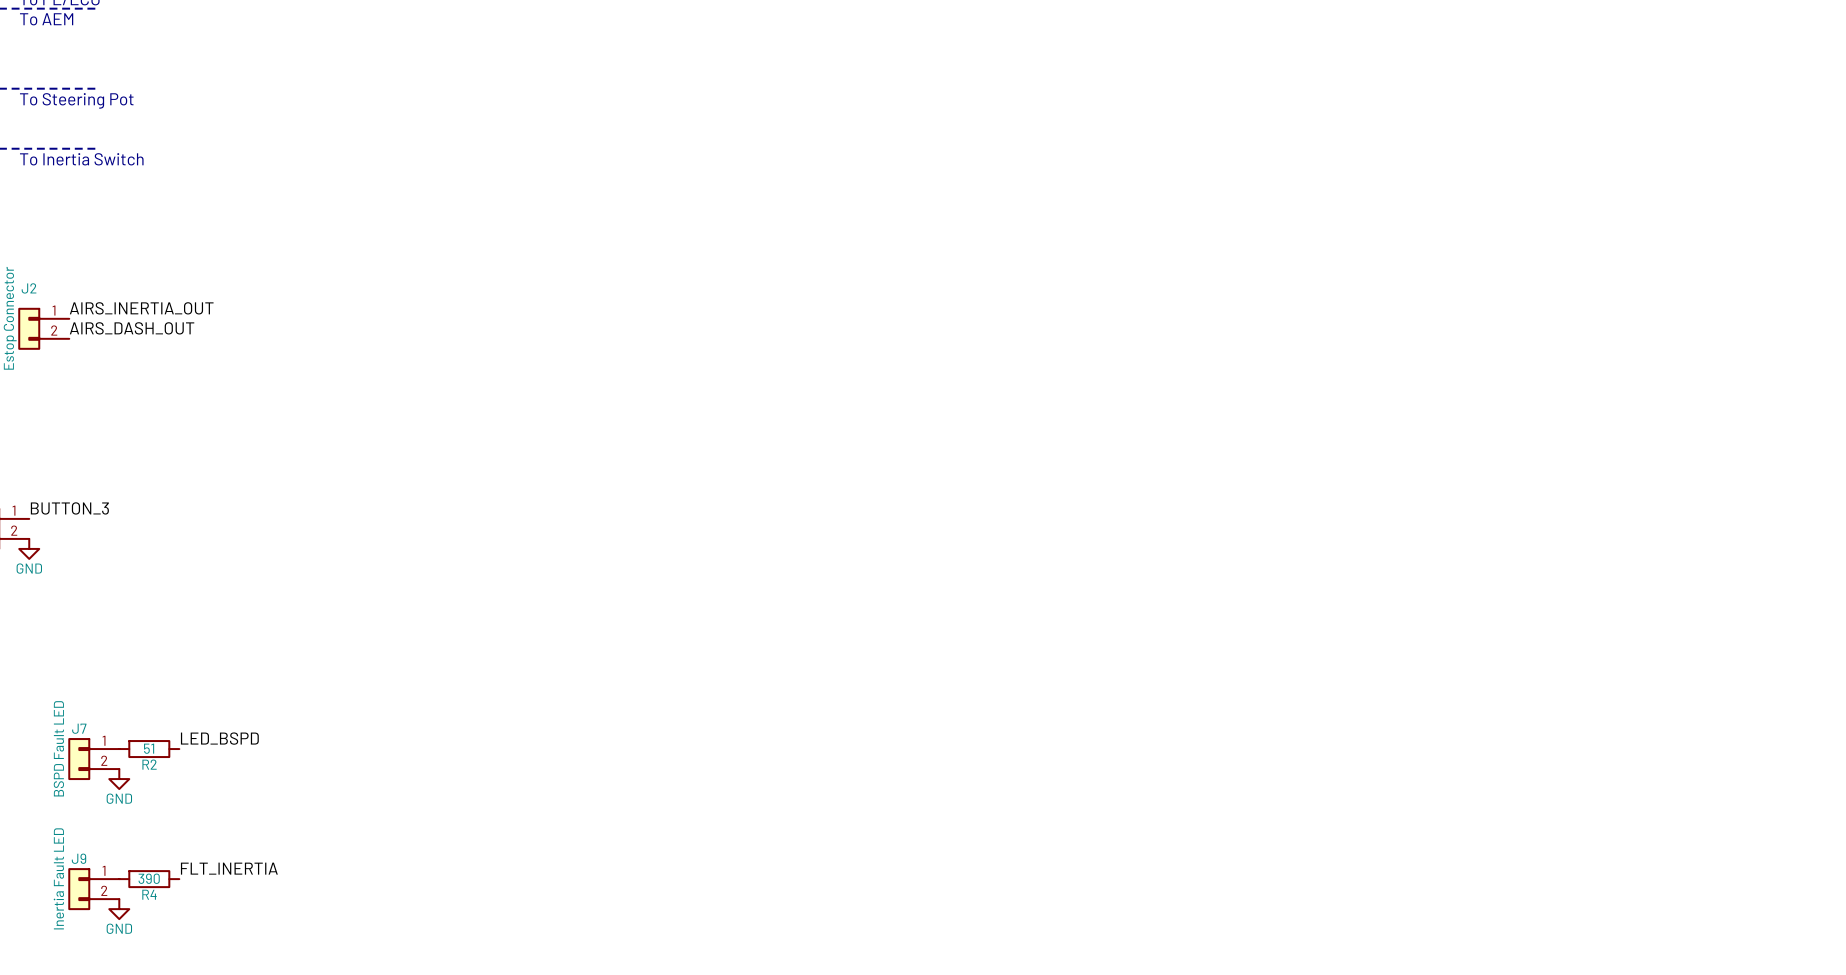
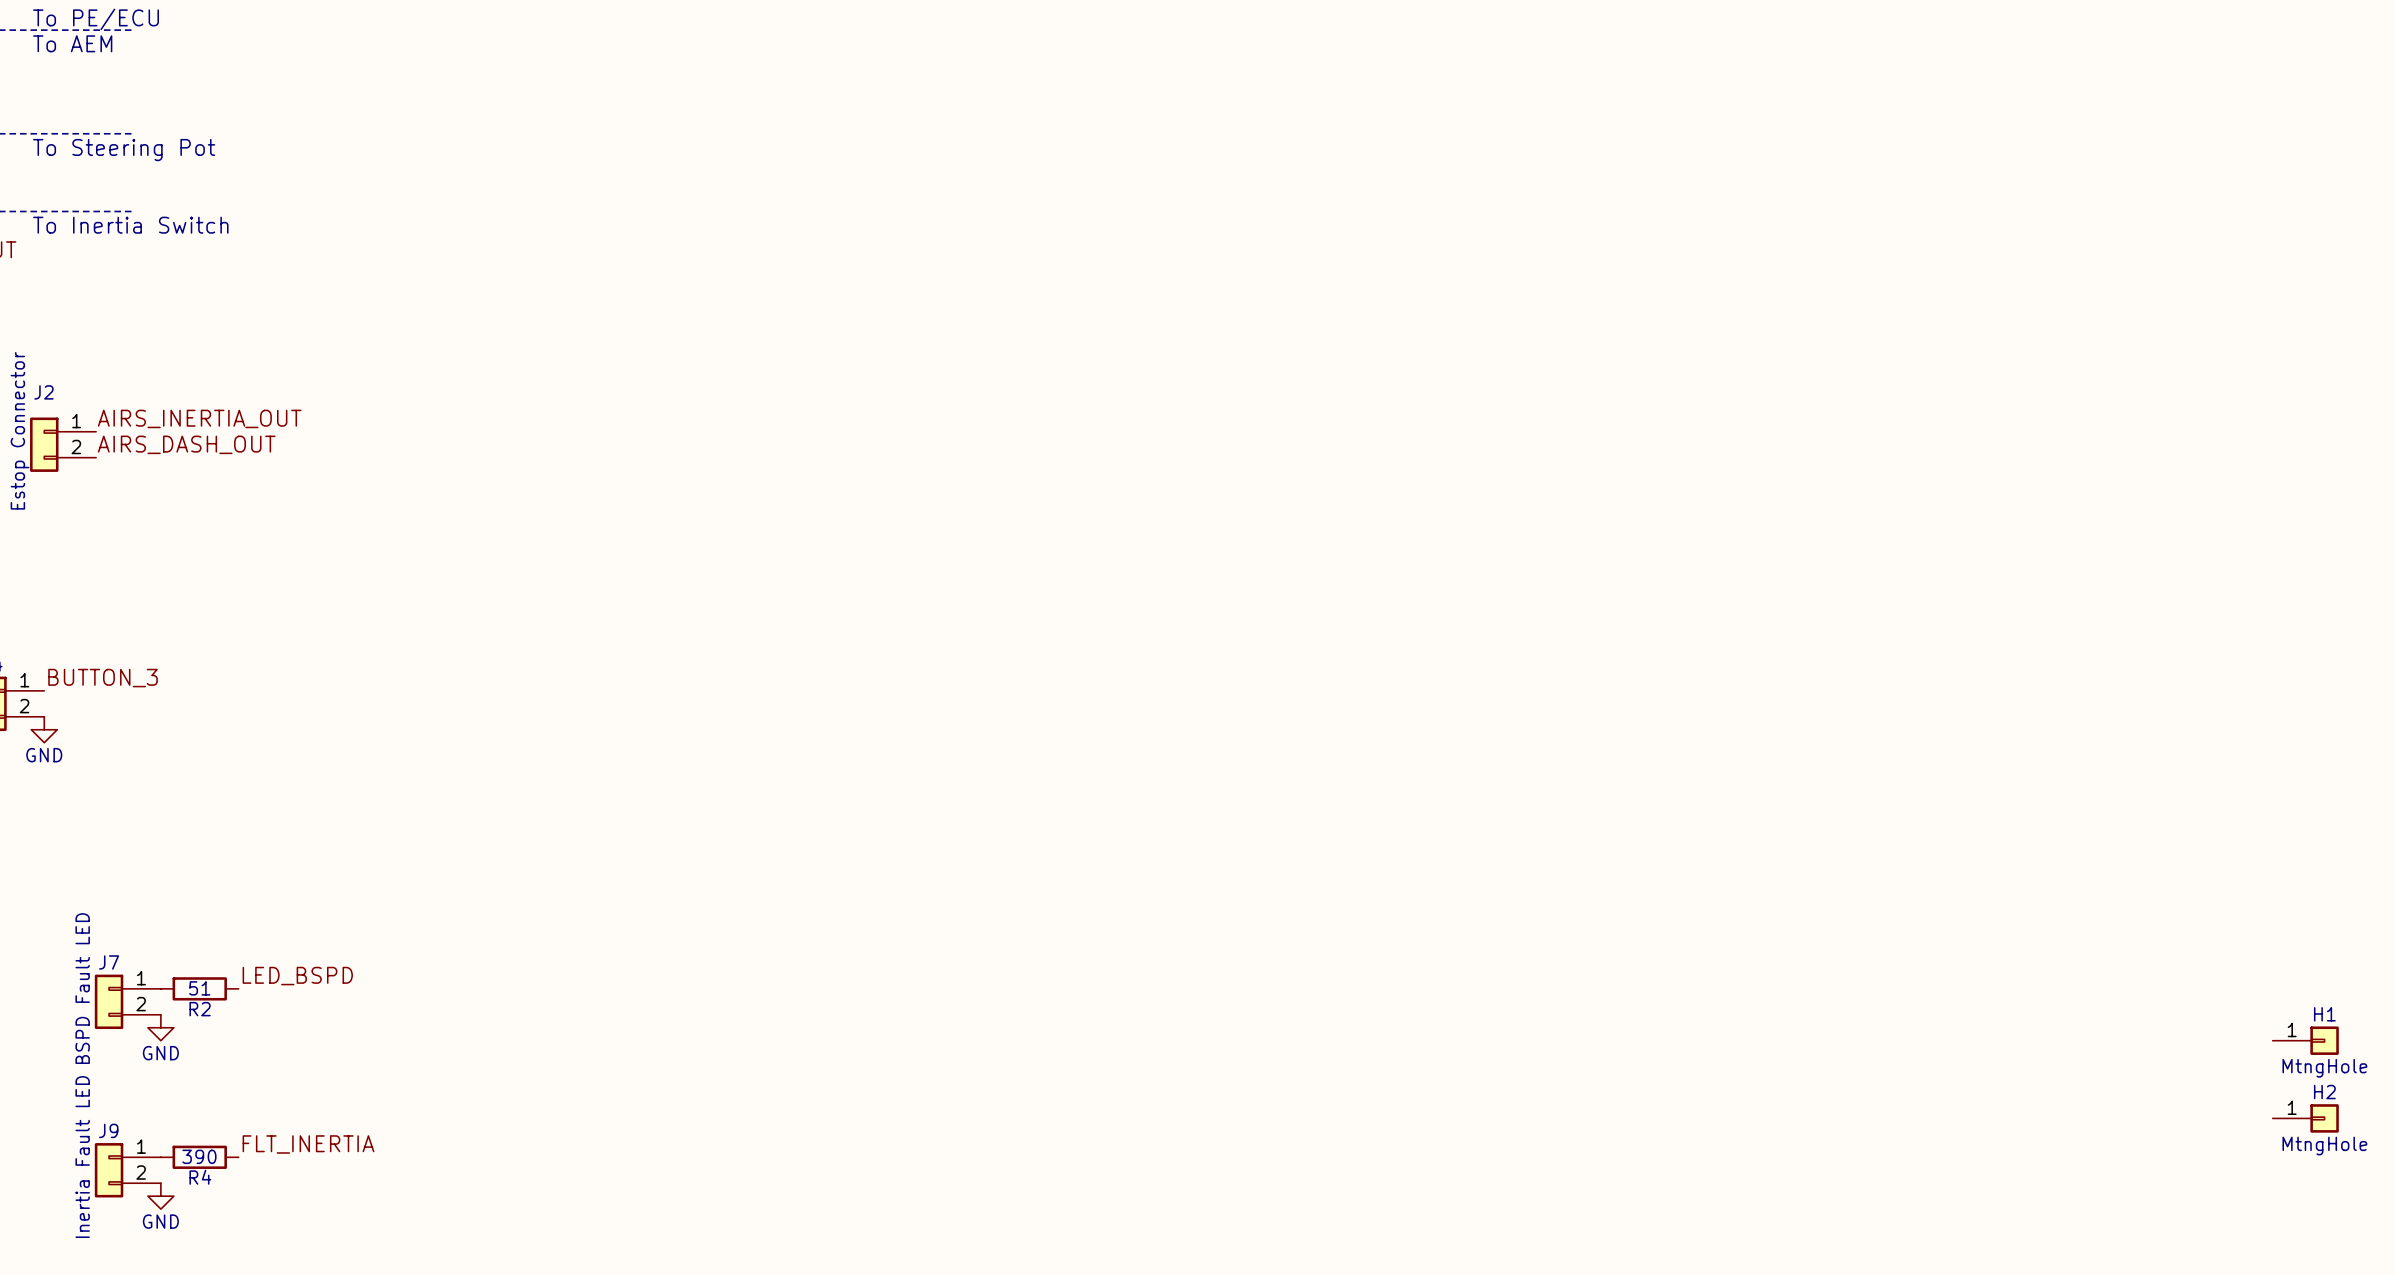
H1: none -> MtngHole (2305, 1040)
H2: none -> MtngHole (2305, 1118)

